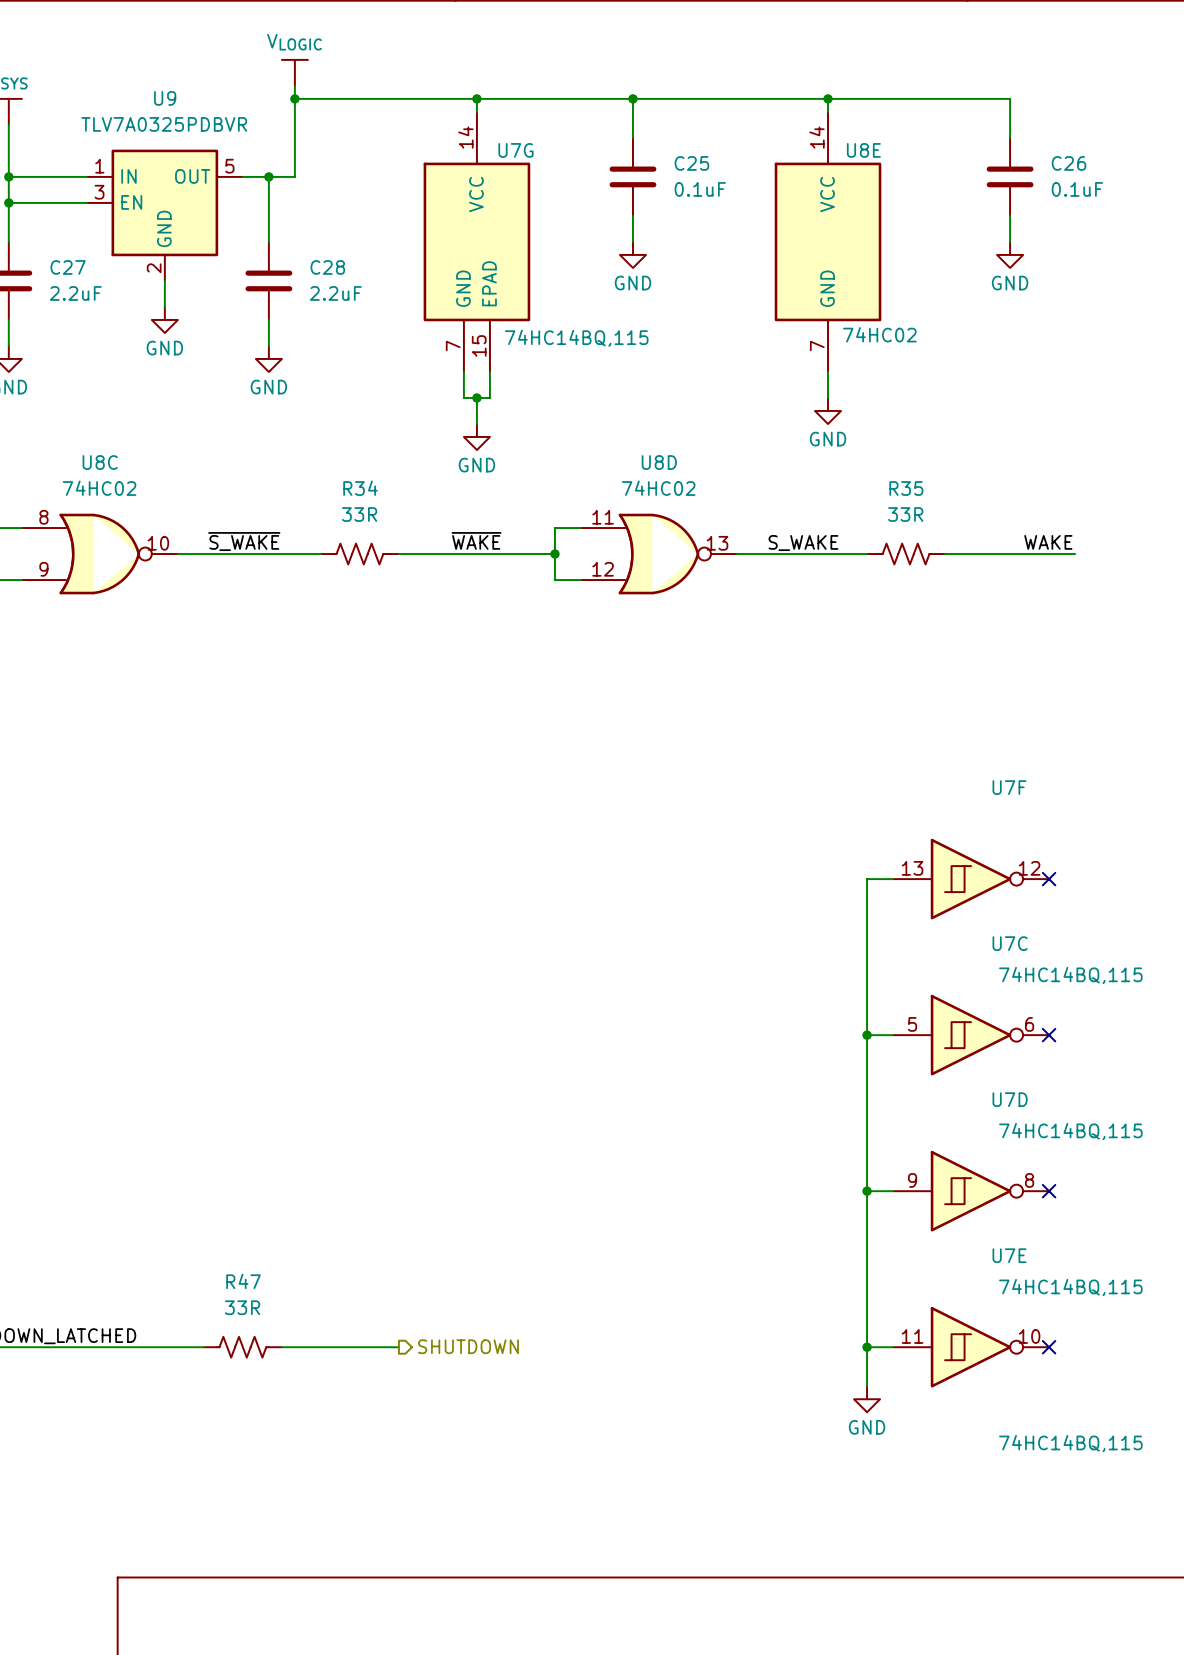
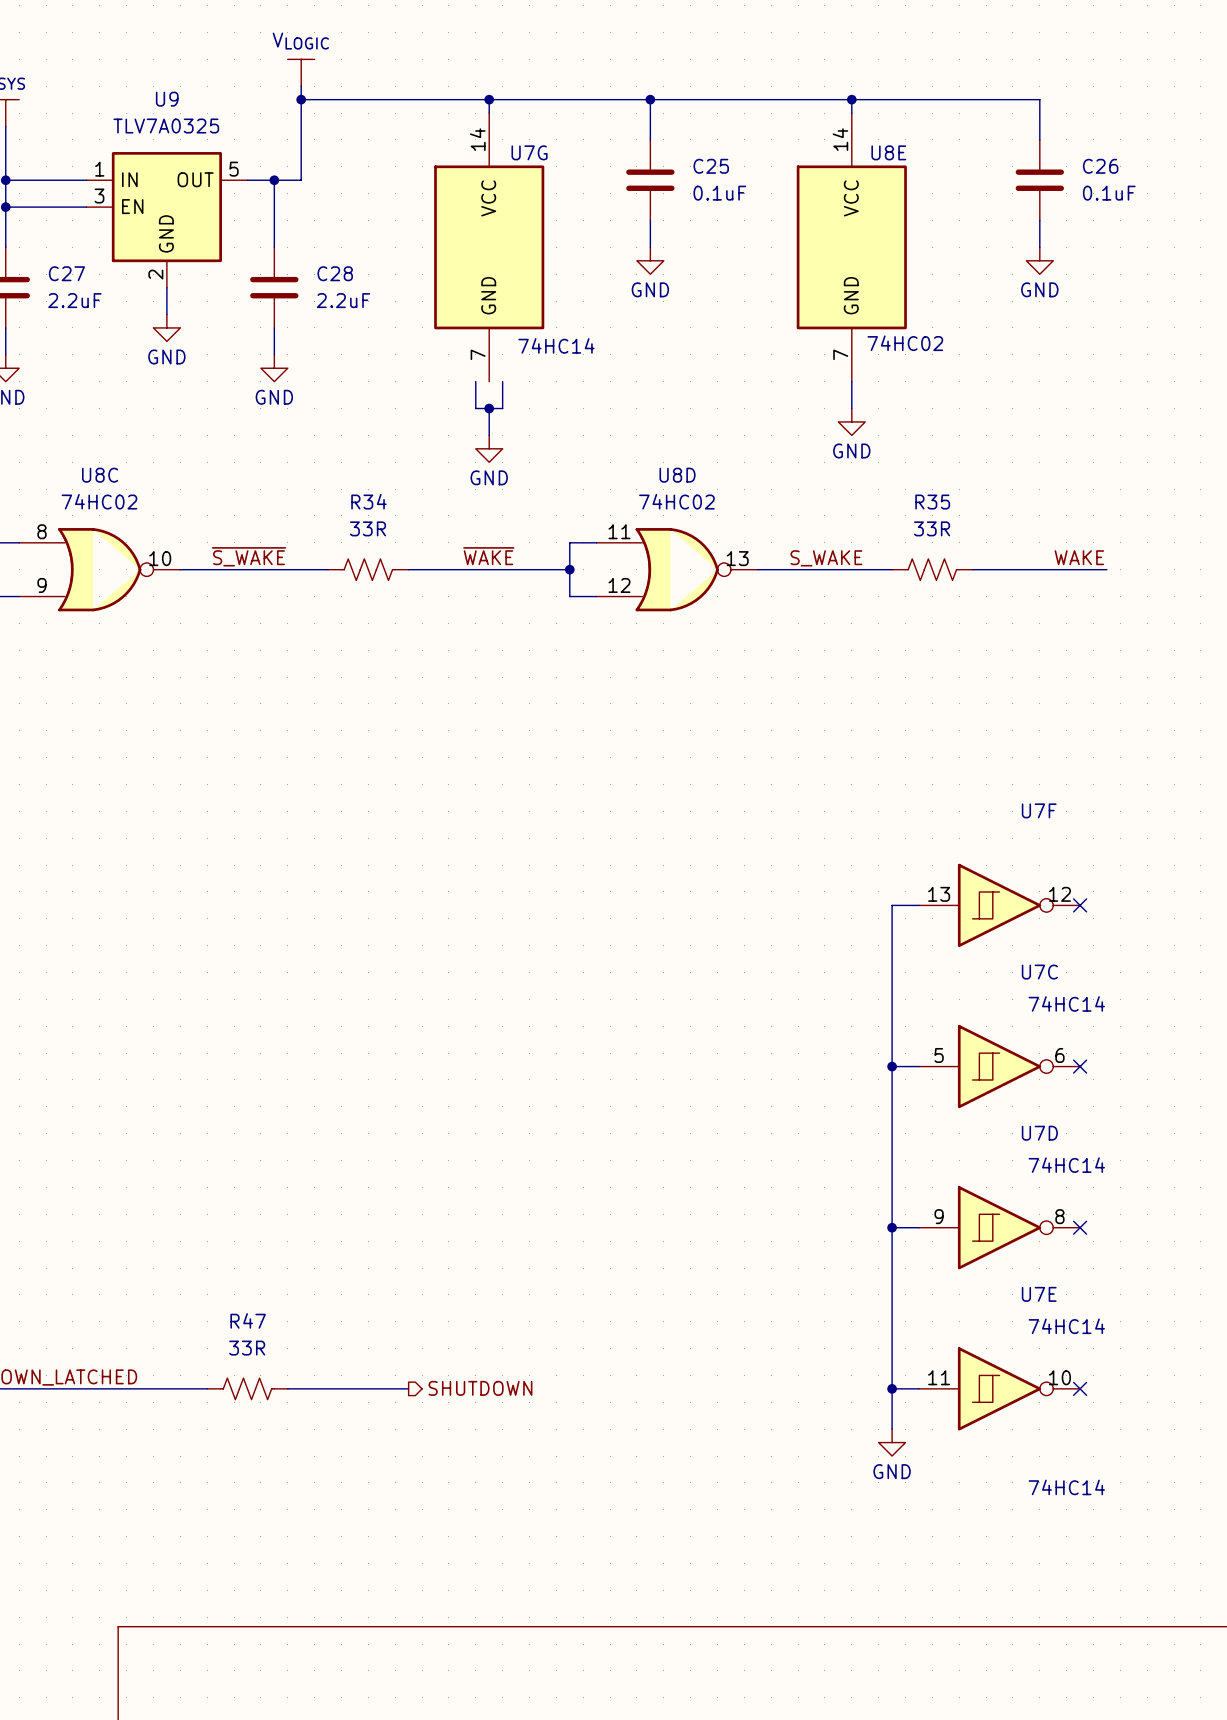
U7G symbol: [423, 111, 531, 372] -> [434, 113, 545, 382]
U9 value: TLV7A0325PDBVR (164, 124) -> TLV7A0325 (166, 126)
U7G value: 74HC14BQ,115 (576, 338) -> 74HC14 (556, 345)
U7F value: 74HC14BQ,115 (1070, 975) -> 74HC14 (1066, 1003)
U7C value: 74HC14BQ,115 (1070, 1131) -> 74HC14 (1066, 1165)
U7D value: 74HC14BQ,115 (1070, 1287) -> 74HC14 (1066, 1326)
U7E value: 74HC14BQ,115 (1070, 1443) -> 74HC14 (1066, 1487)

